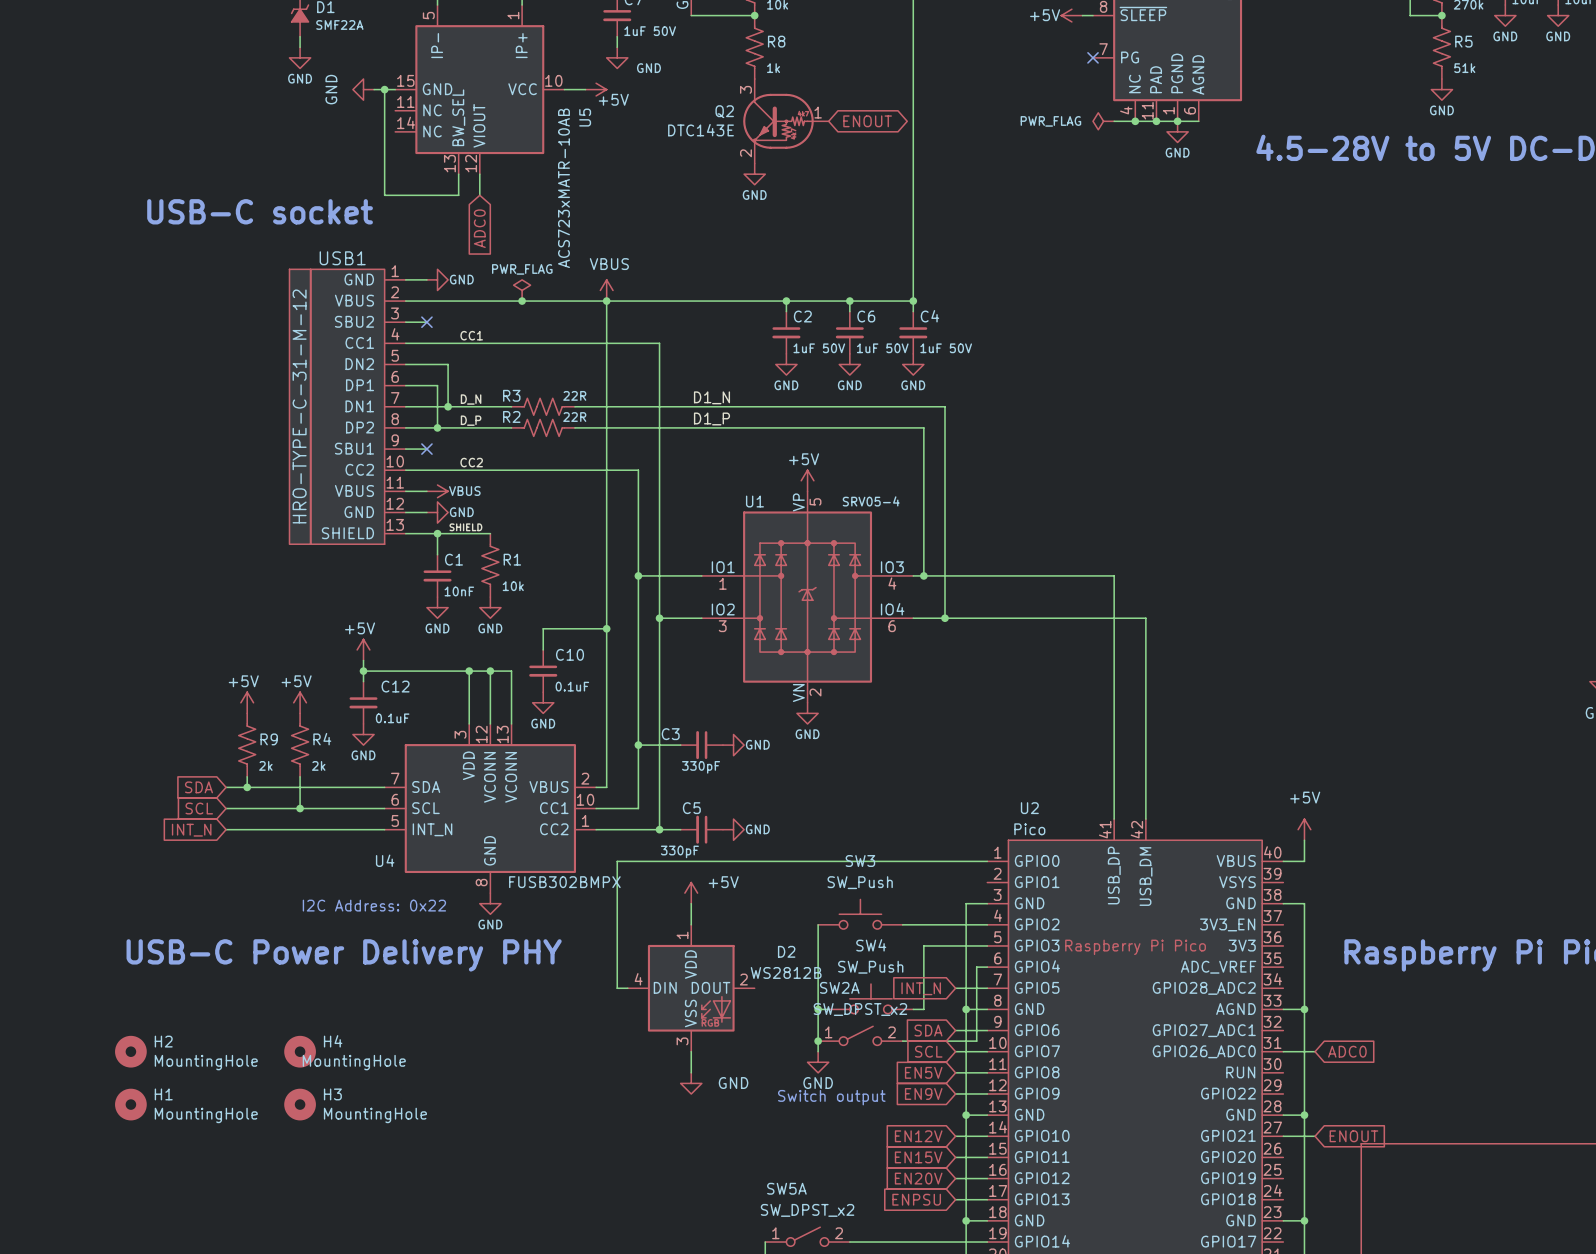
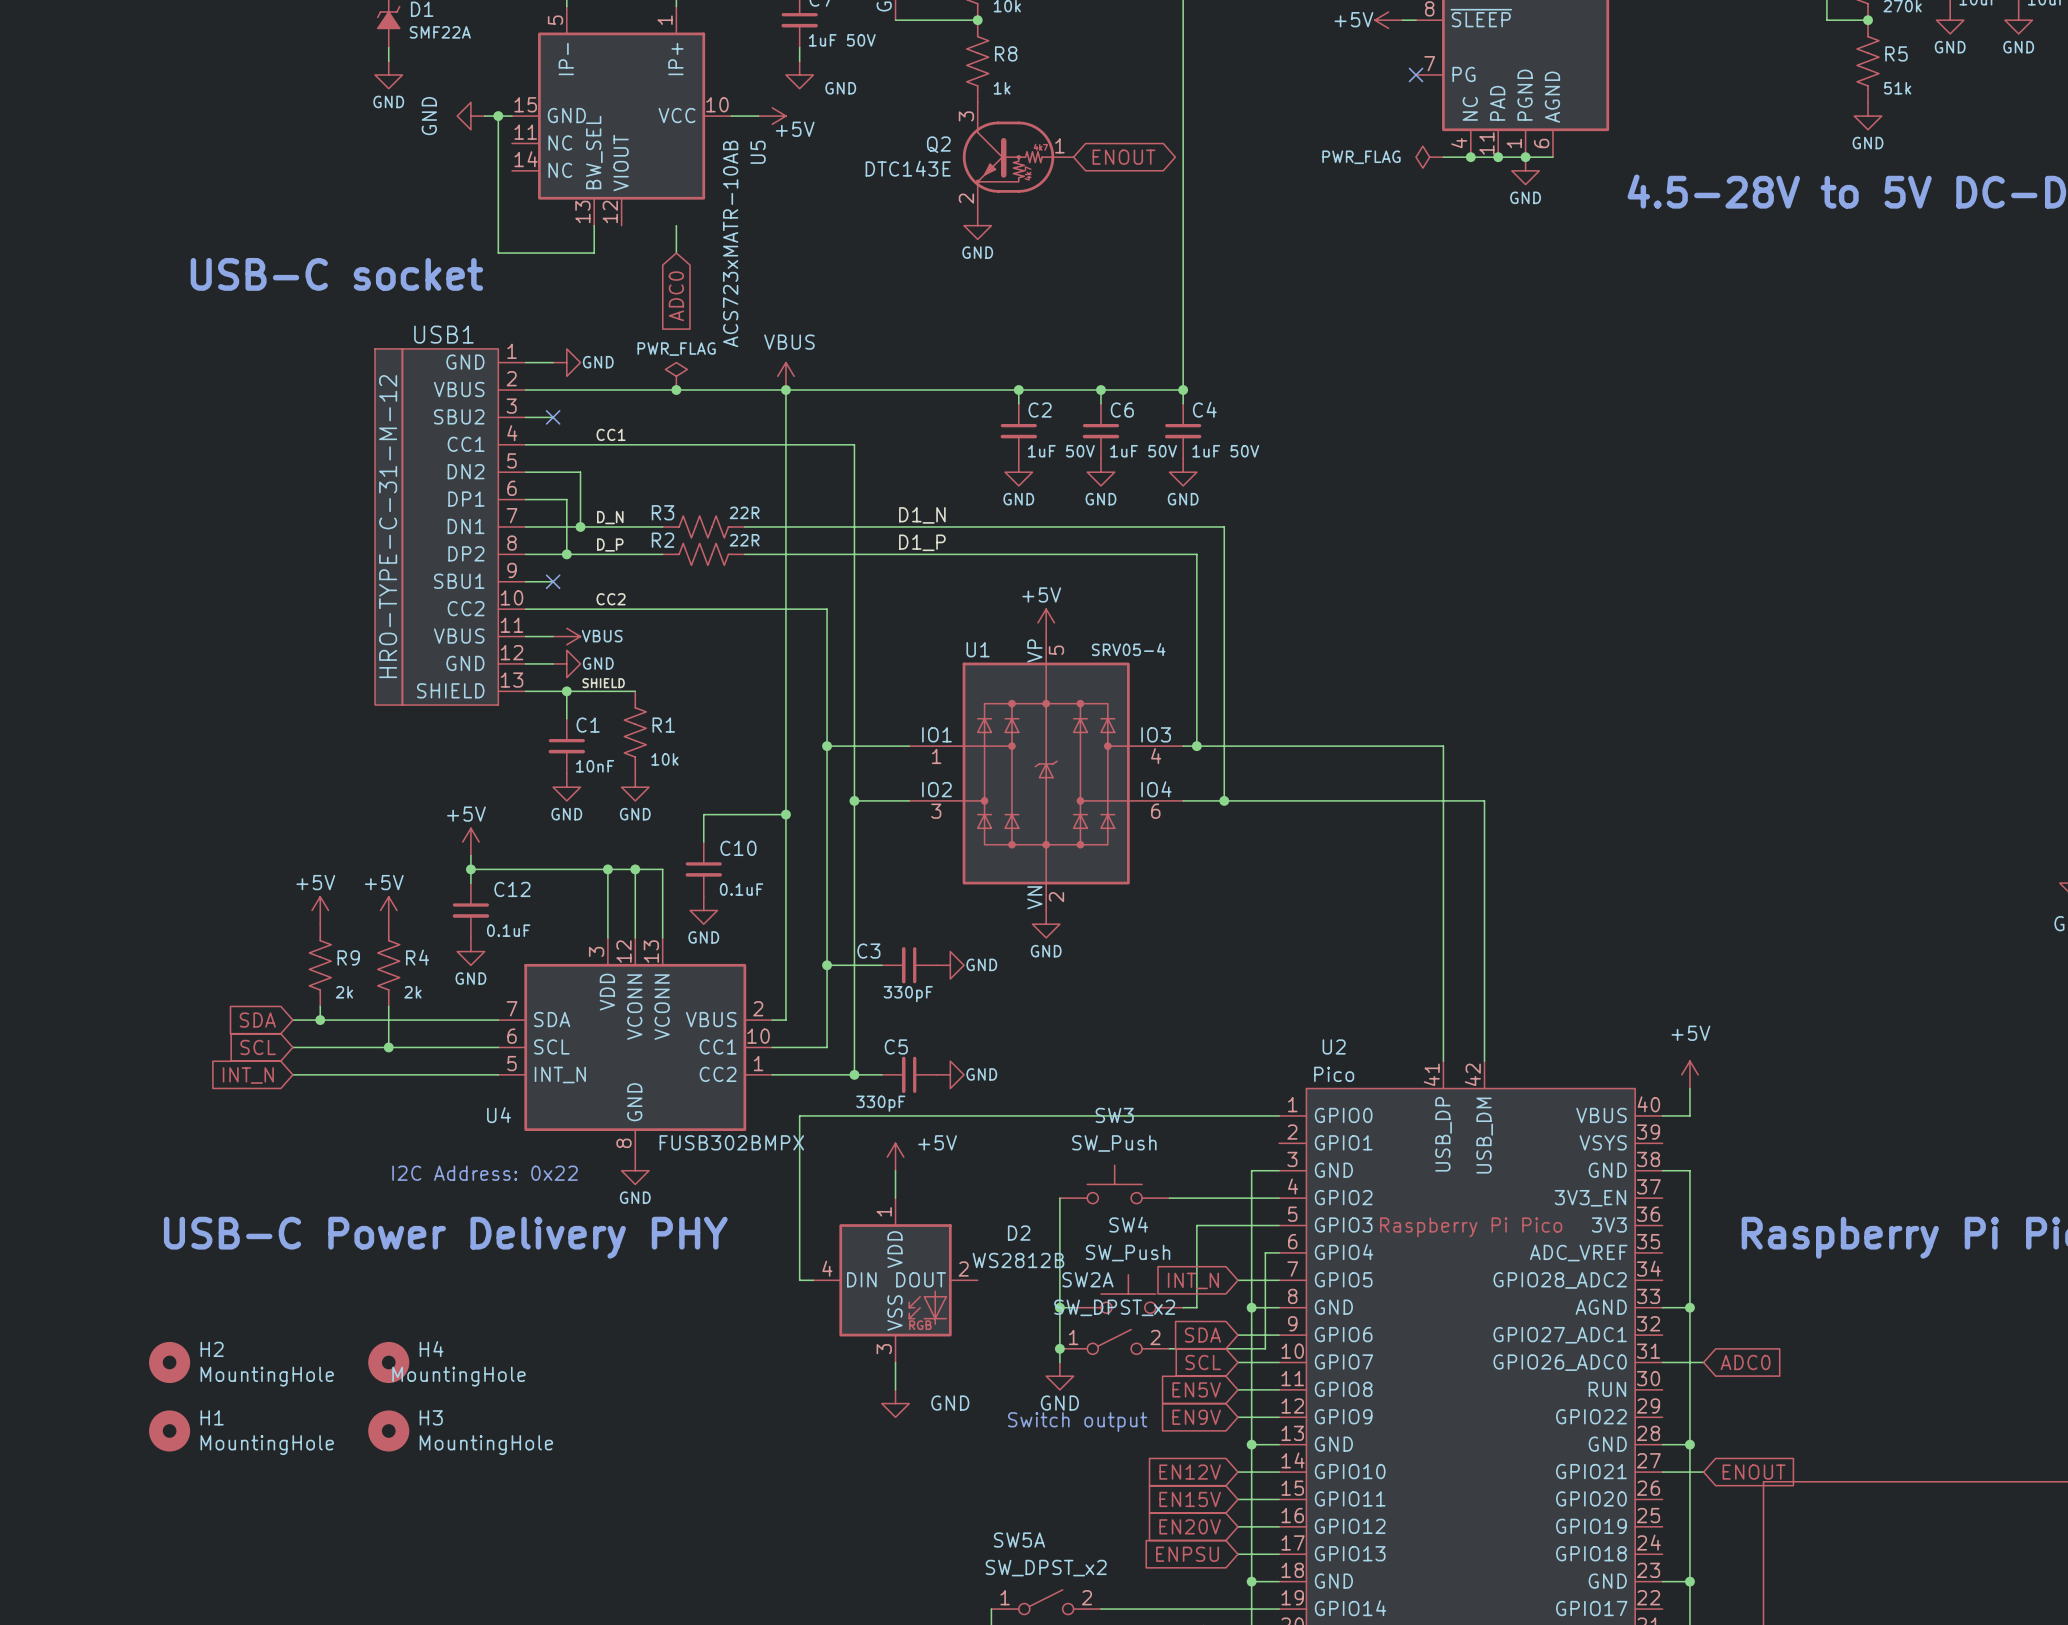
wire: (479, 174) (479, 195) -> (676, 225) (676, 253)
global label position: ADC0 (479, 228) -> ADC0 (676, 296)

